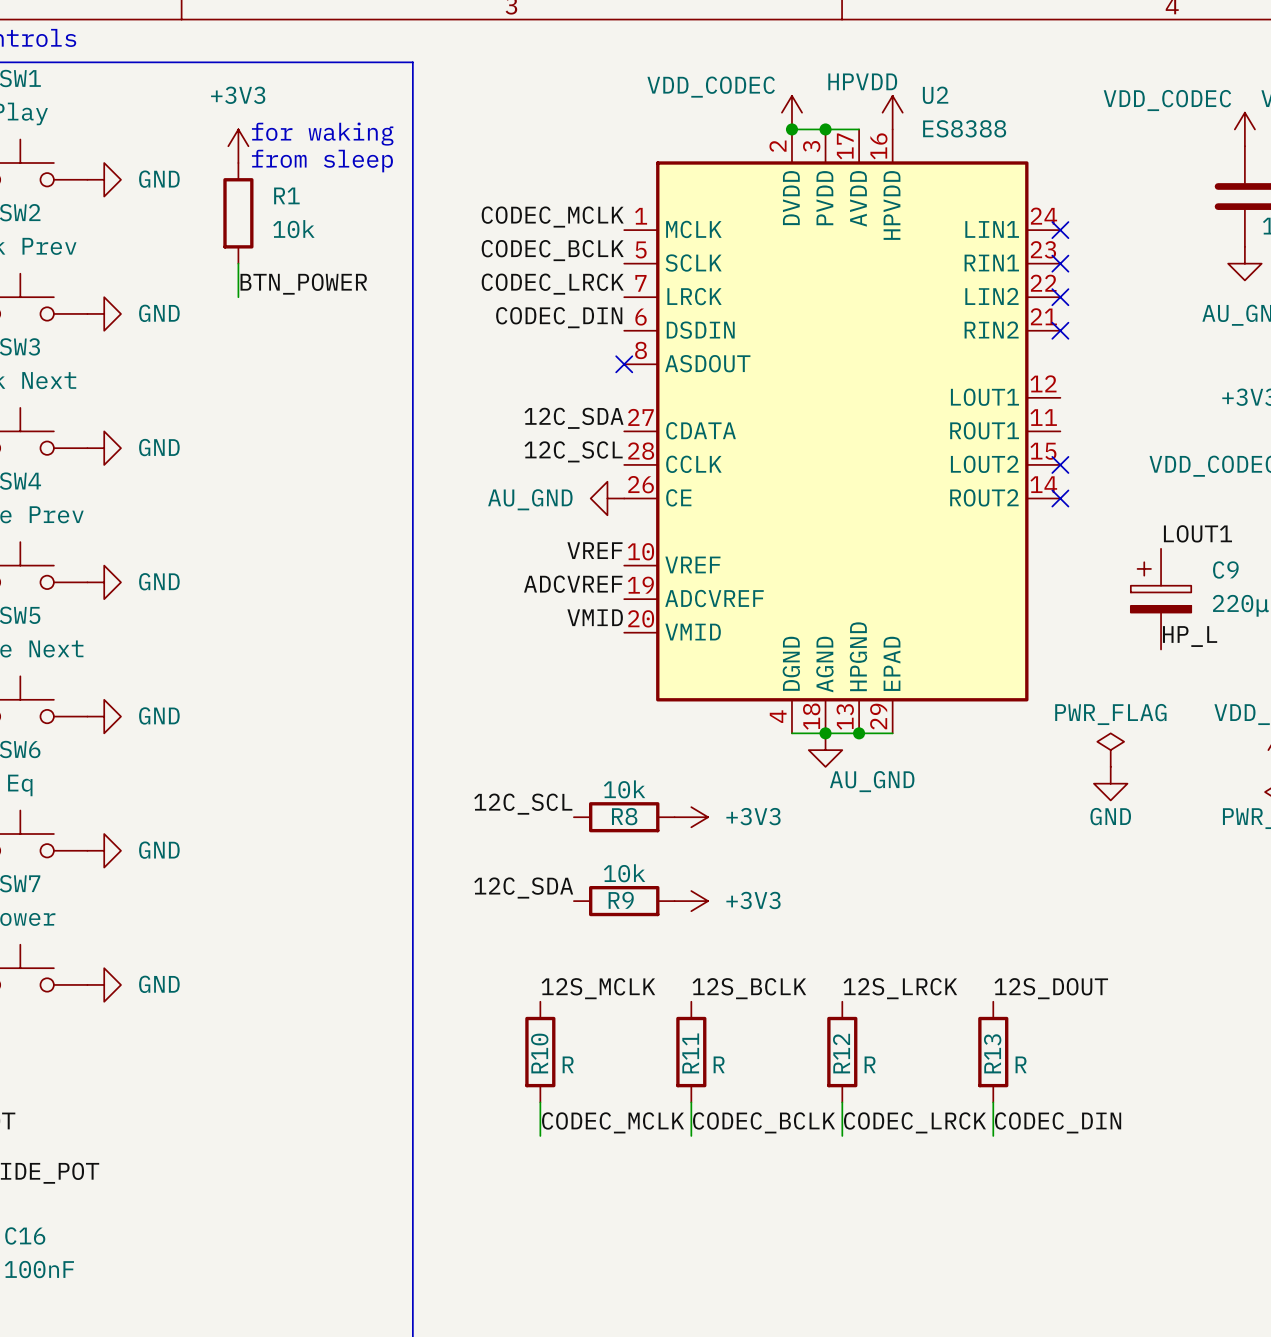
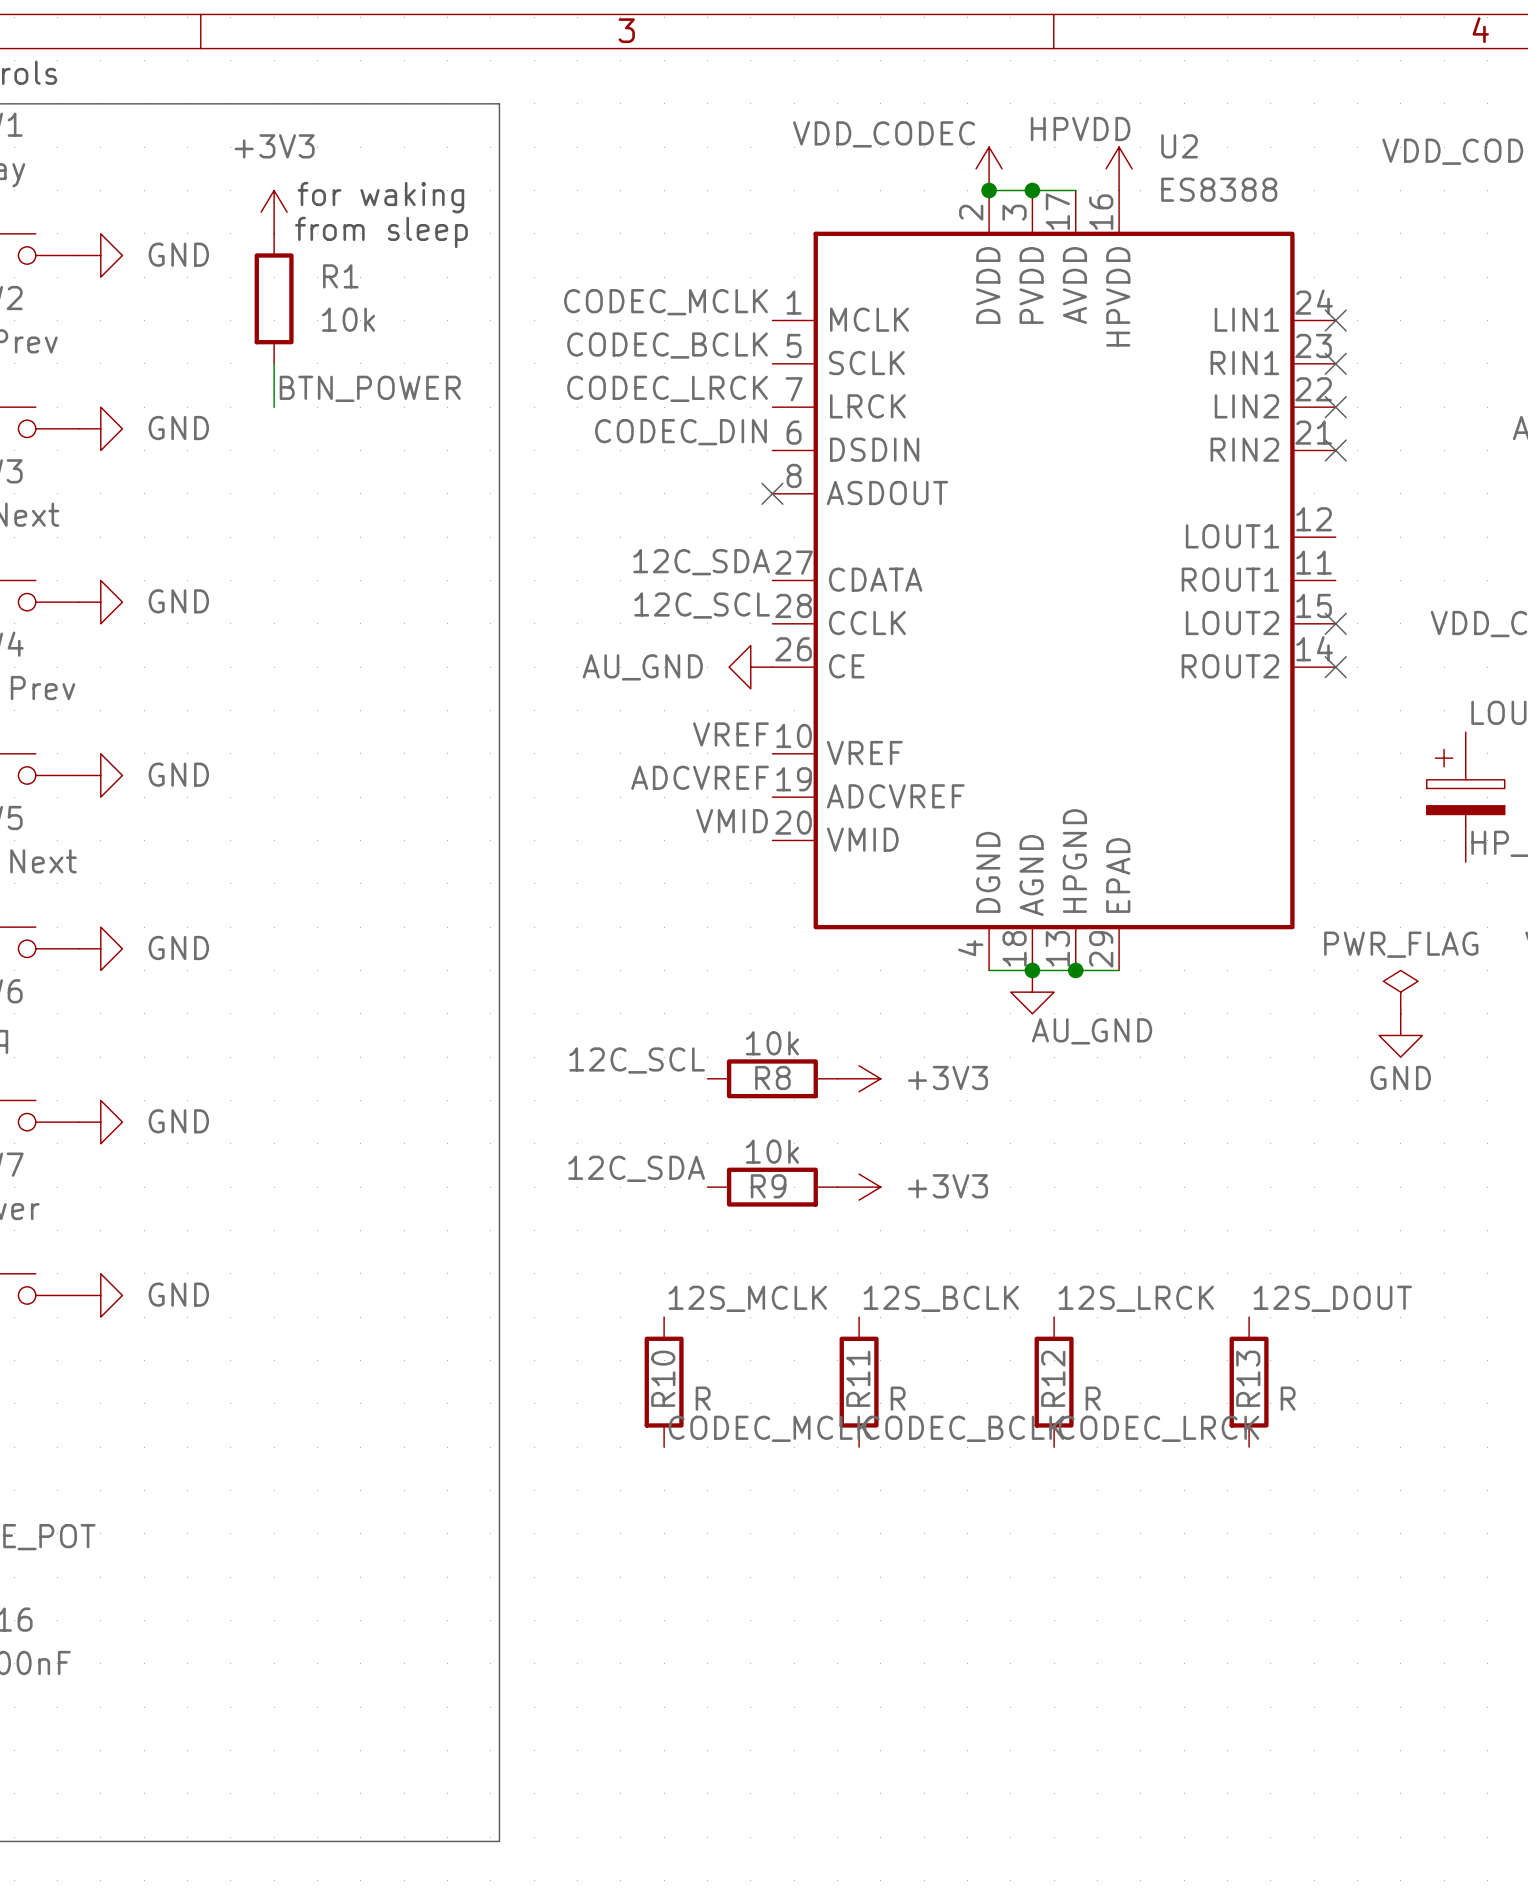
wire: (540, 1102) (540, 1135) -> none
wire: (691, 1102) (691, 1135) -> none
wire: (842, 1102) (842, 1135) -> none
wire: (993, 1102) (993, 1135) -> none
label position: CODEC_MCLK (613, 1122) -> CODEC_MCLK (770, 1428)
label position: CODEC_BCLK (764, 1122) -> CODEC_BCLK (963, 1428)
label position: CODEC_LRCK (914, 1122) -> CODEC_LRCK (1158, 1428)
label: CODEC_DIN (1058, 1122) -> none

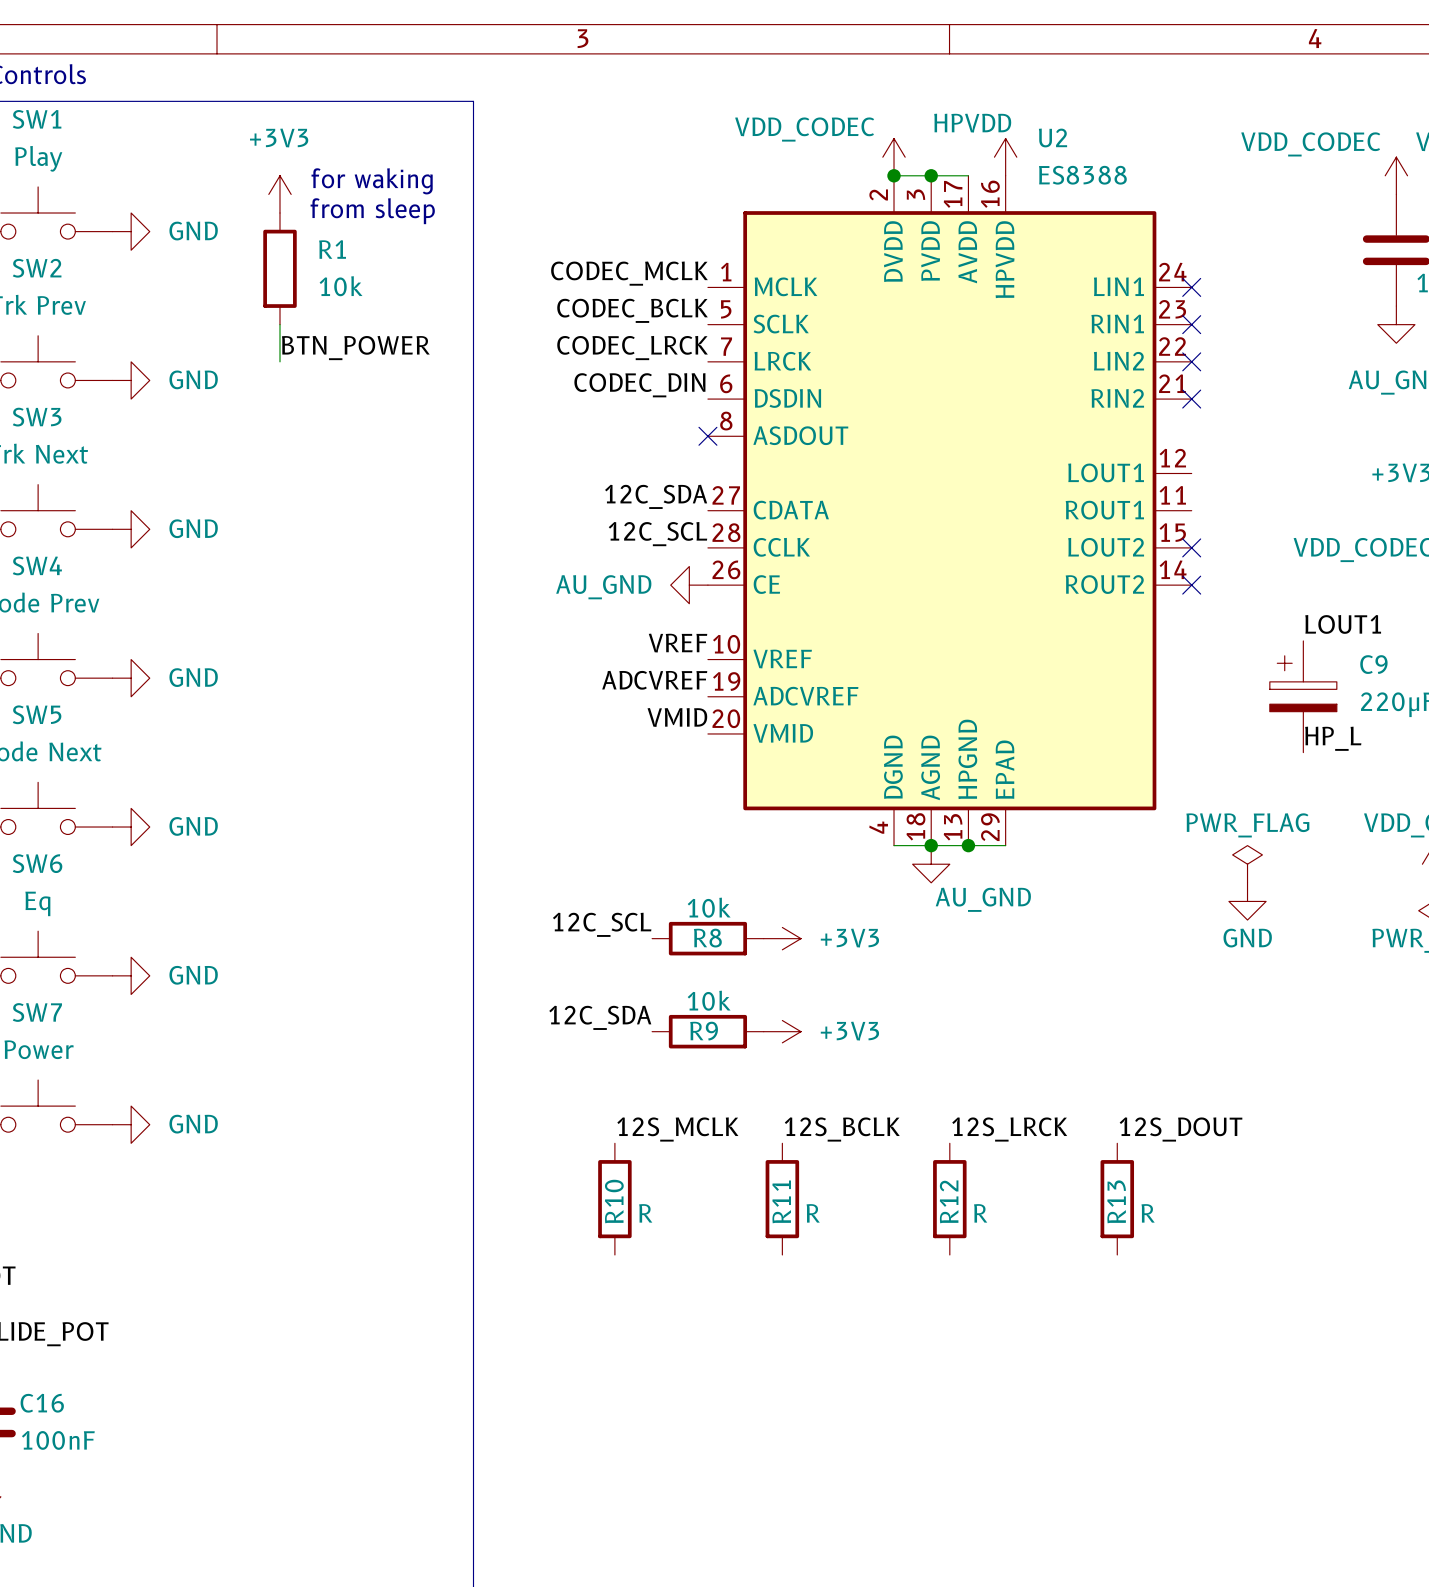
label: CODEC_MCLK (770, 1428) -> none
label: CODEC_BCLK (963, 1428) -> none
label: CODEC_LRCK (1158, 1428) -> none

